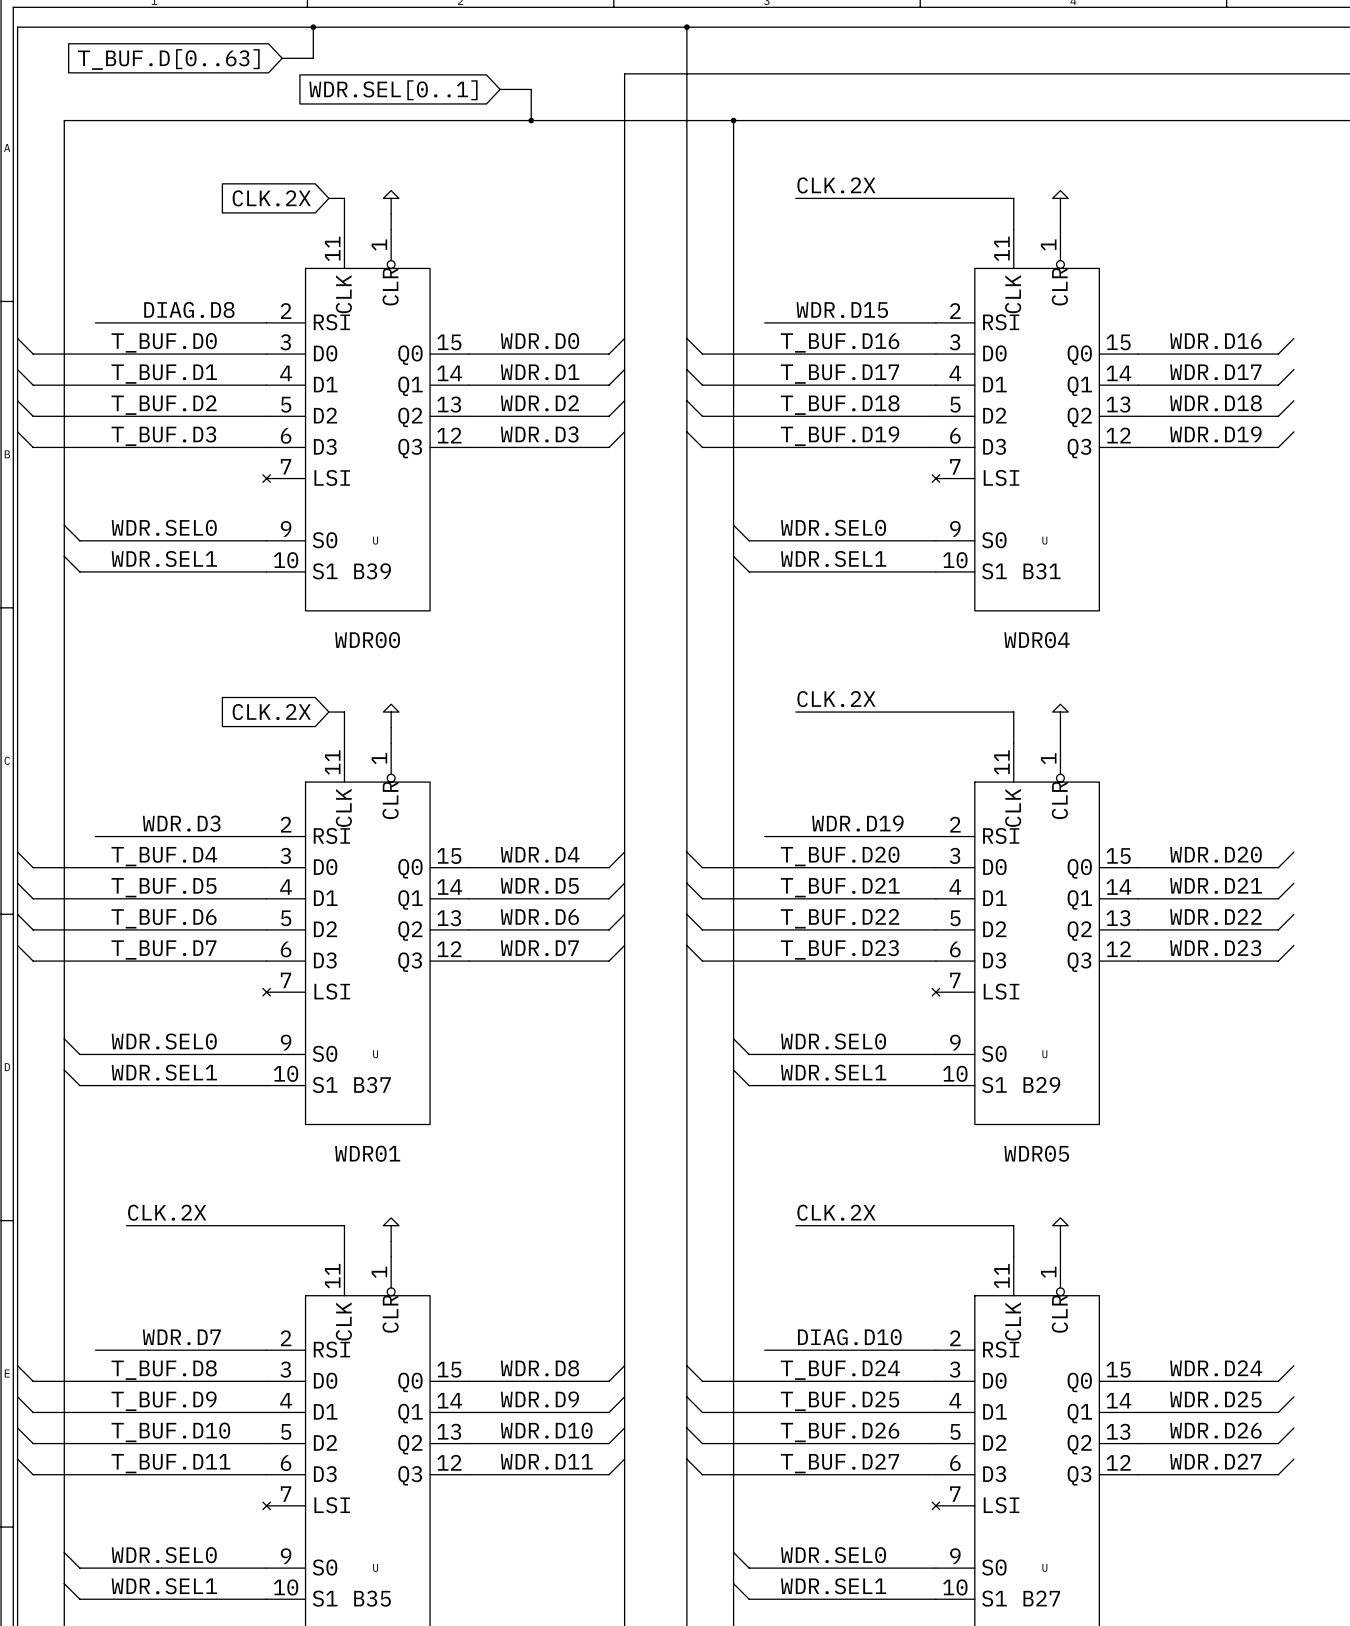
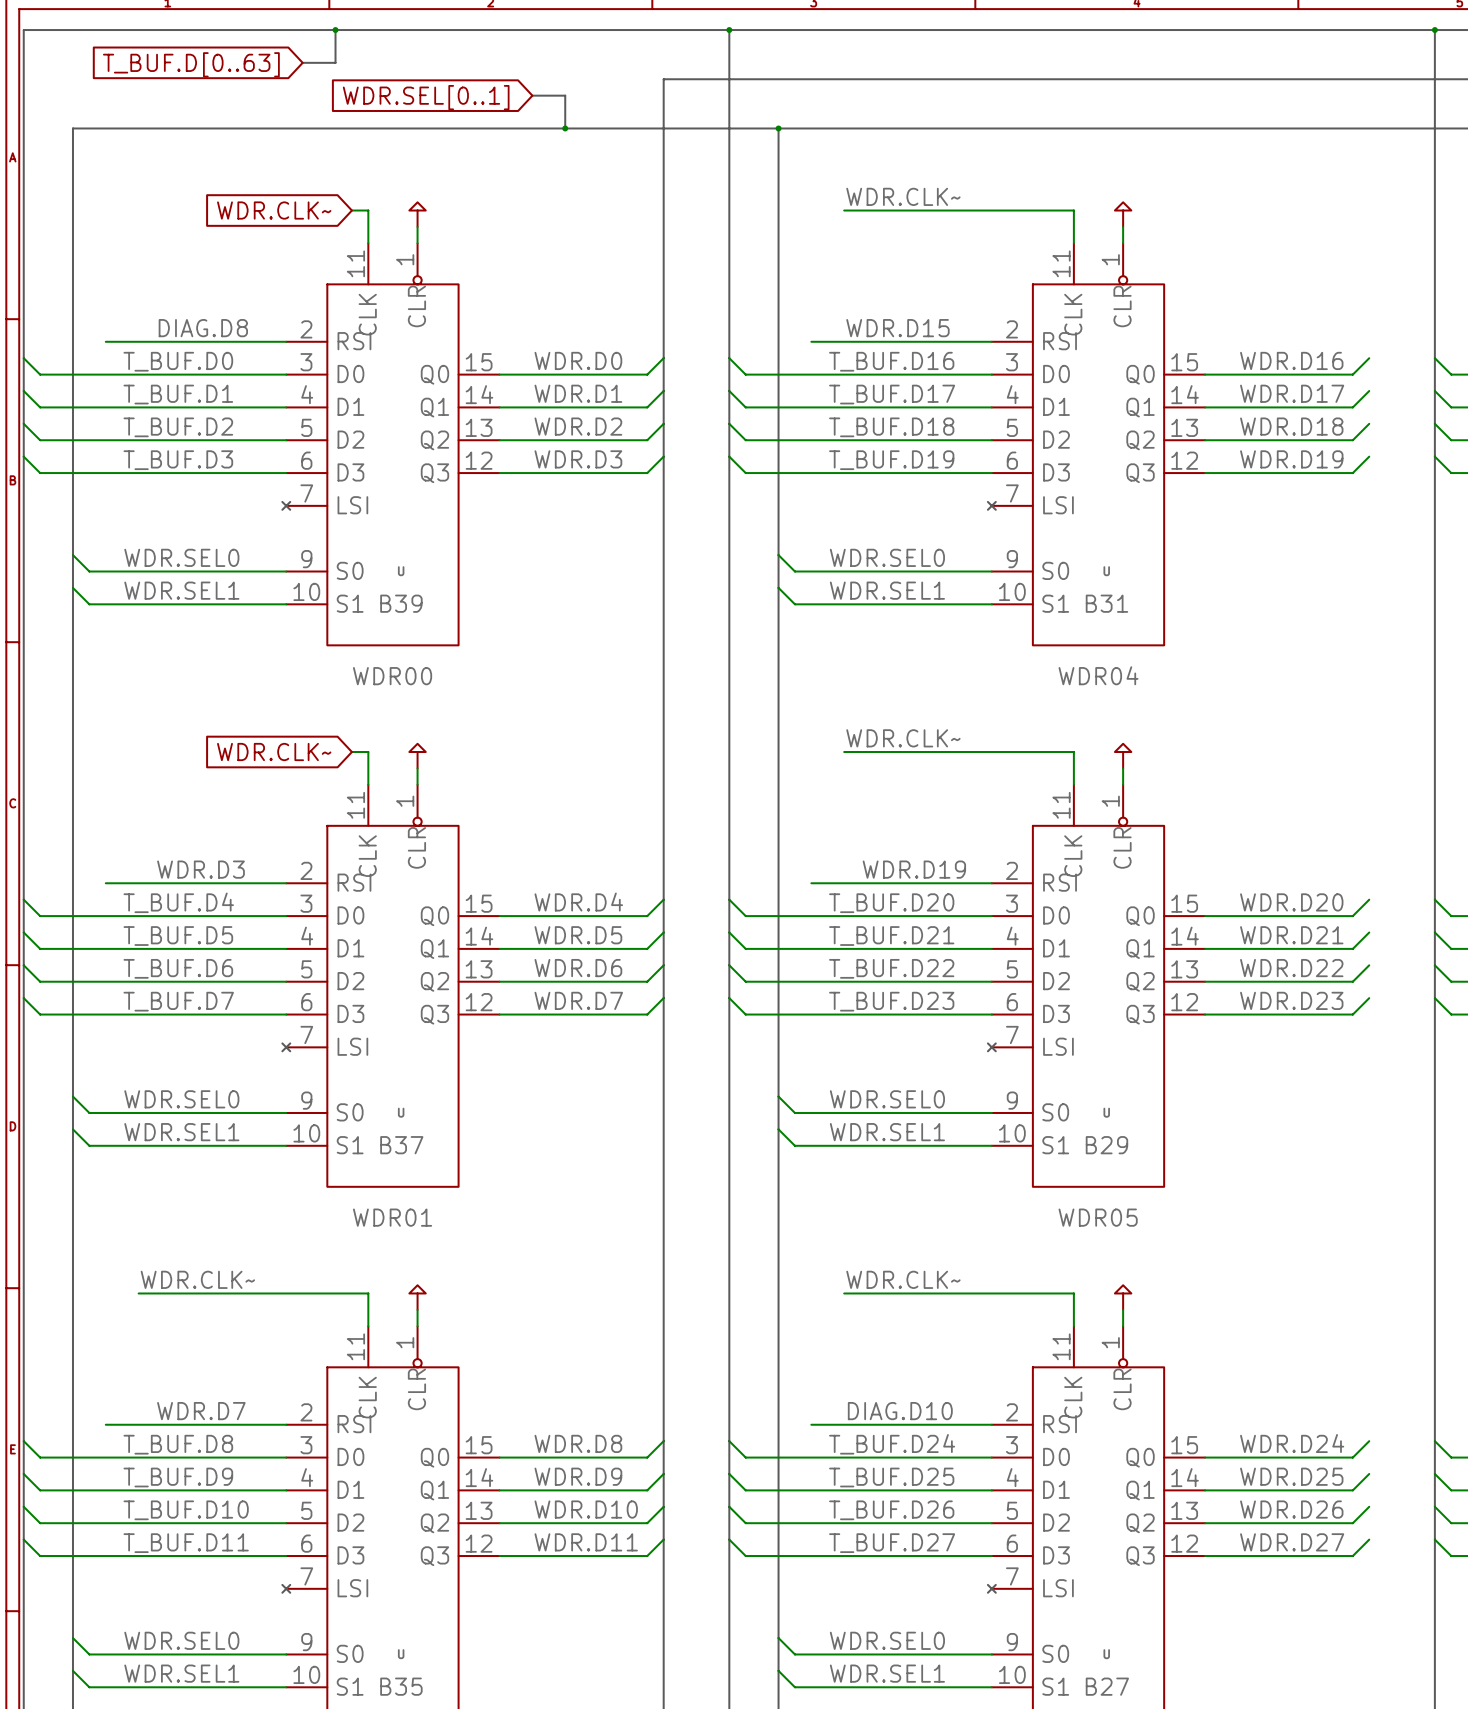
label: CLK.2X (836, 185) -> WDR.CLK~ (903, 196)
global label: CLK.2X (271, 198) -> WDR.CLK~ (274, 210)
label: CLK.2X (836, 699) -> WDR.CLK~ (903, 738)
global label: CLK.2X (271, 712) -> WDR.CLK~ (274, 752)
label: CLK.2X (167, 1212) -> WDR.CLK~ (197, 1279)
label: CLK.2X (836, 1212) -> WDR.CLK~ (903, 1279)

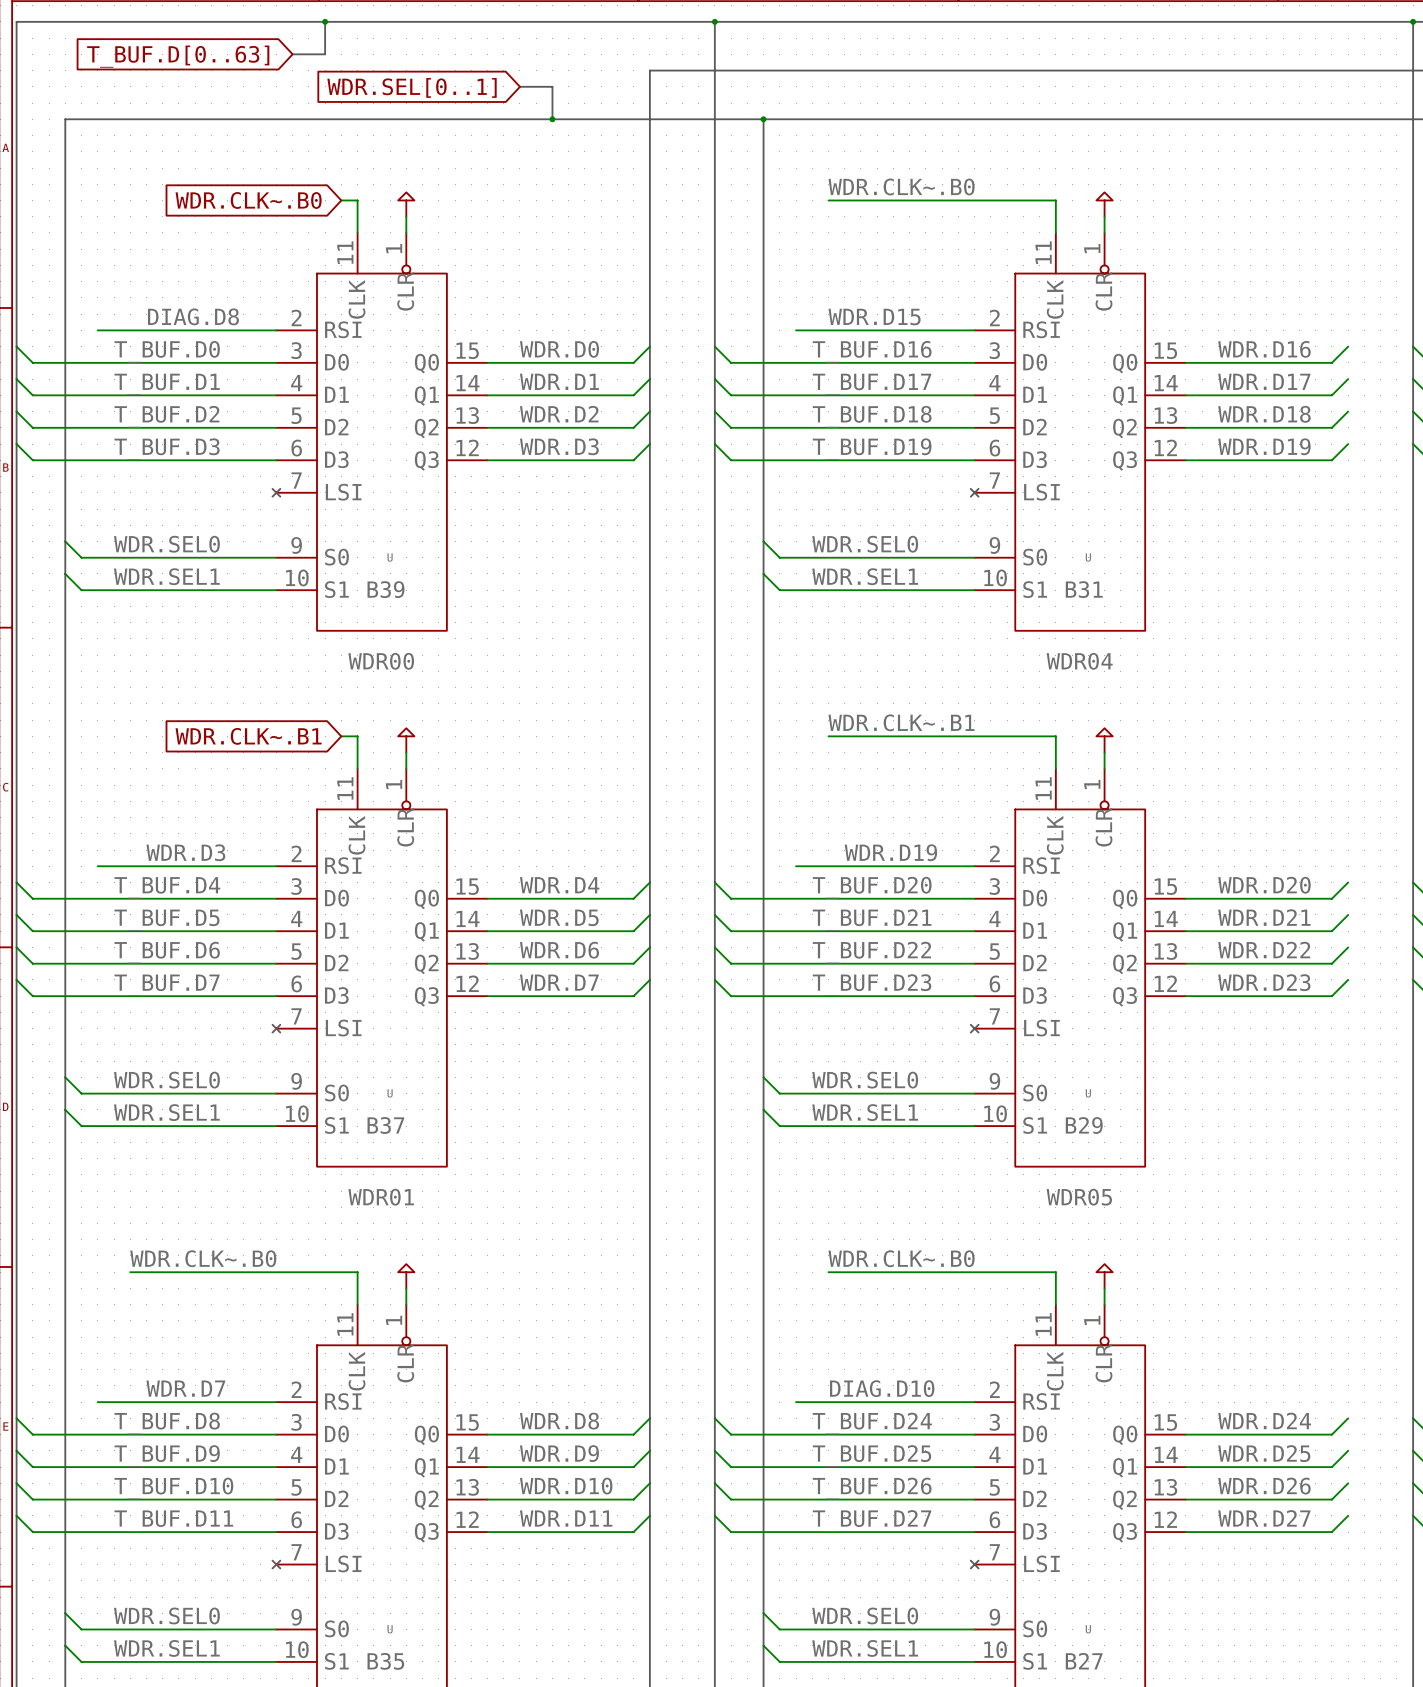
label: WDR.CLK~ (903, 196) -> WDR.CLK~.B0 (901, 186)
global label: WDR.CLK~ (274, 210) -> WDR.CLK~.B0 (248, 200)
label: WDR.CLK~ (903, 738) -> WDR.CLK~.B1 (901, 722)
global label: WDR.CLK~ (274, 752) -> WDR.CLK~.B1 (248, 736)
label: WDR.CLK~ (197, 1279) -> WDR.CLK~.B0 (203, 1258)
label: WDR.CLK~ (903, 1279) -> WDR.CLK~.B0 (901, 1258)

